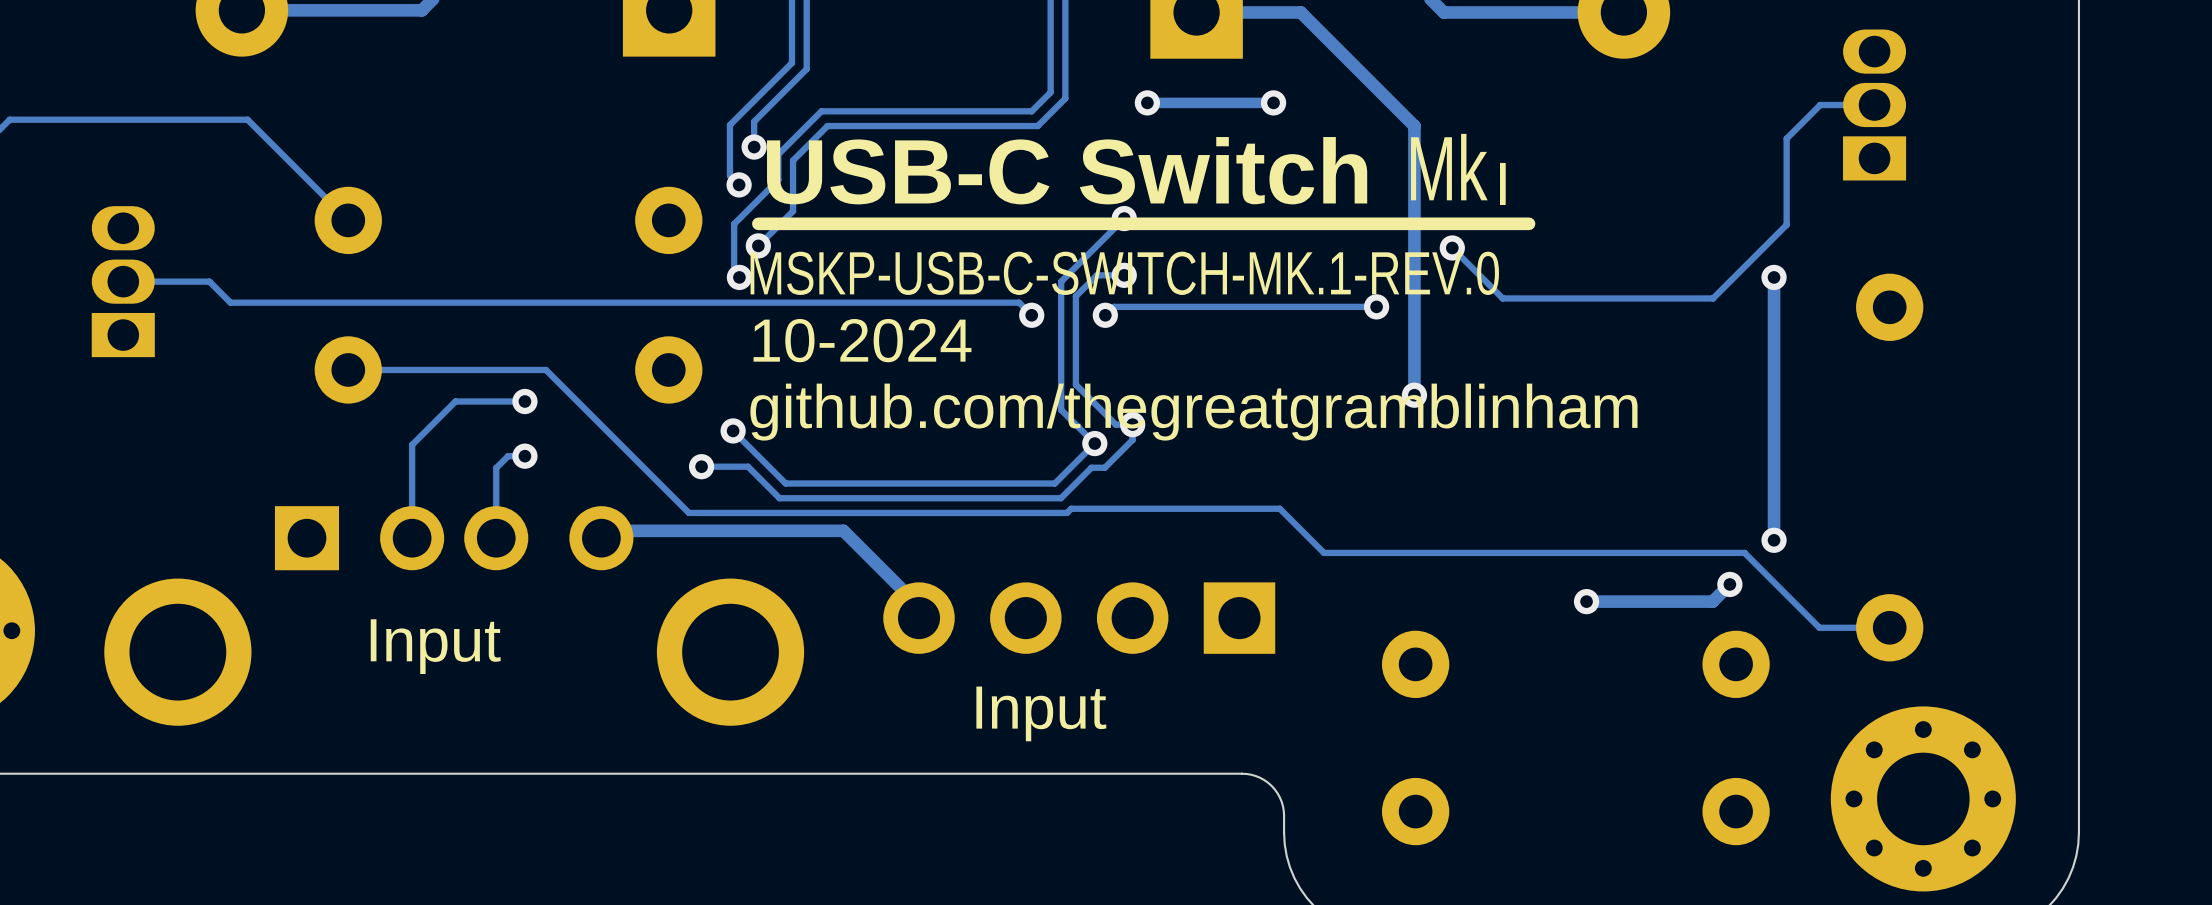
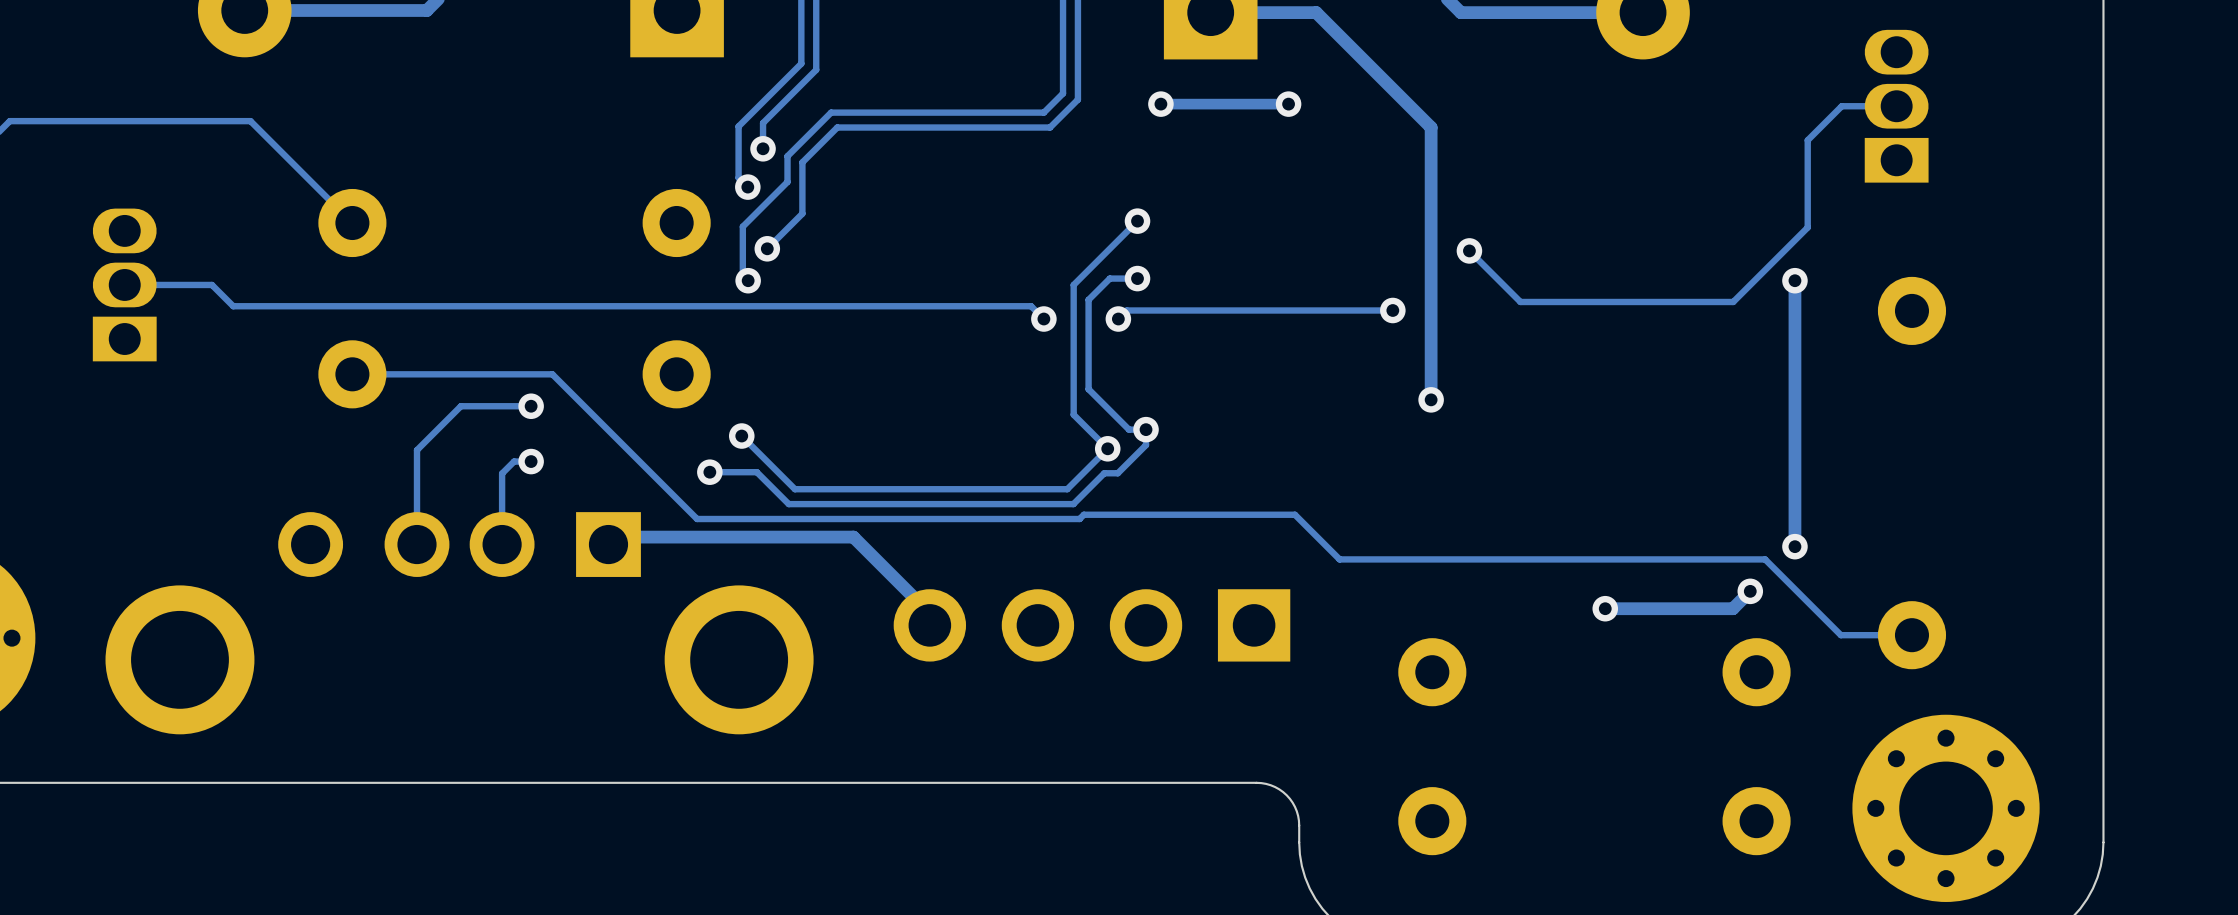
text: Mk (1449, 167) -> none
text: USB-C Switch (1067, 170) -> none
text: I (1502, 183) -> none
line: (1529, 223) (758, 223) -> none
text: MSKP-USB-C-SWITCH-MK.1-REV.0 (1124, 273) -> none
text: 10-2024 (862, 340) -> none
text: github.com/thegreatgramblinham (1193, 412) -> none
part footprint: [104, 506, 805, 726] -> [105, 512, 814, 735]
text: Input (435, 646) -> none
text: Input (1041, 713) -> none

